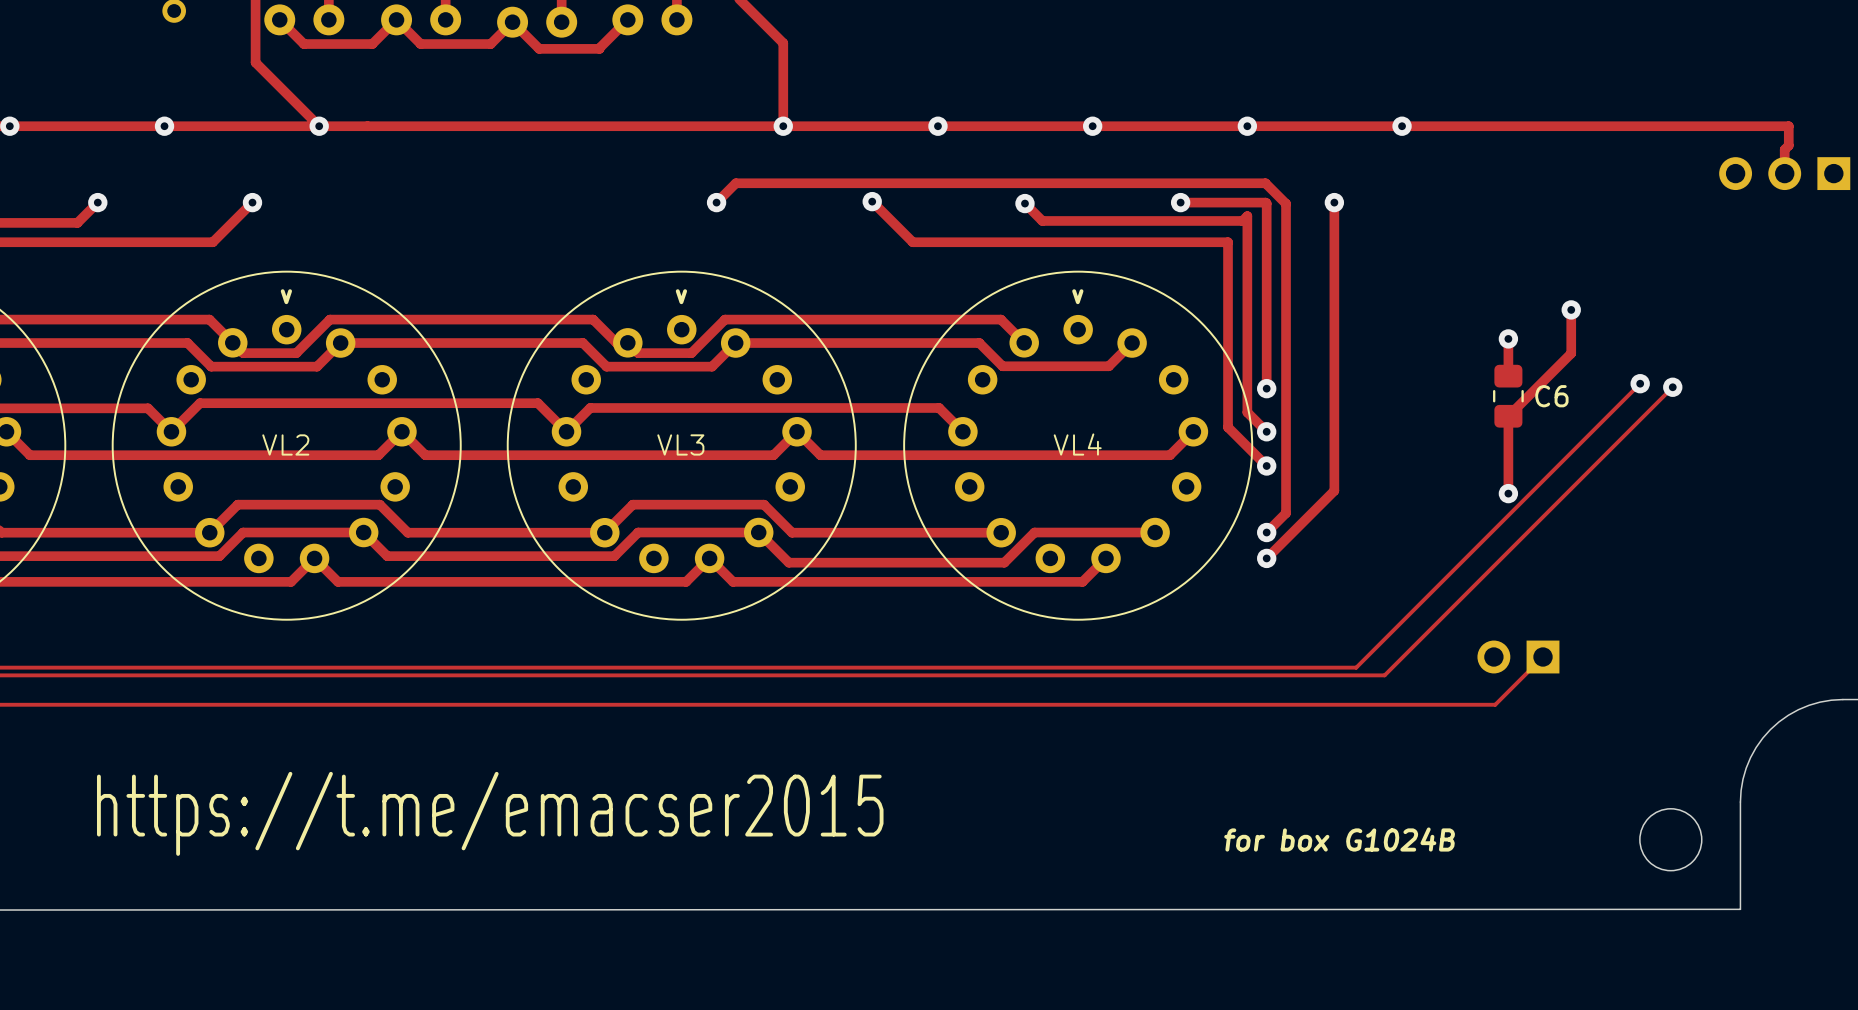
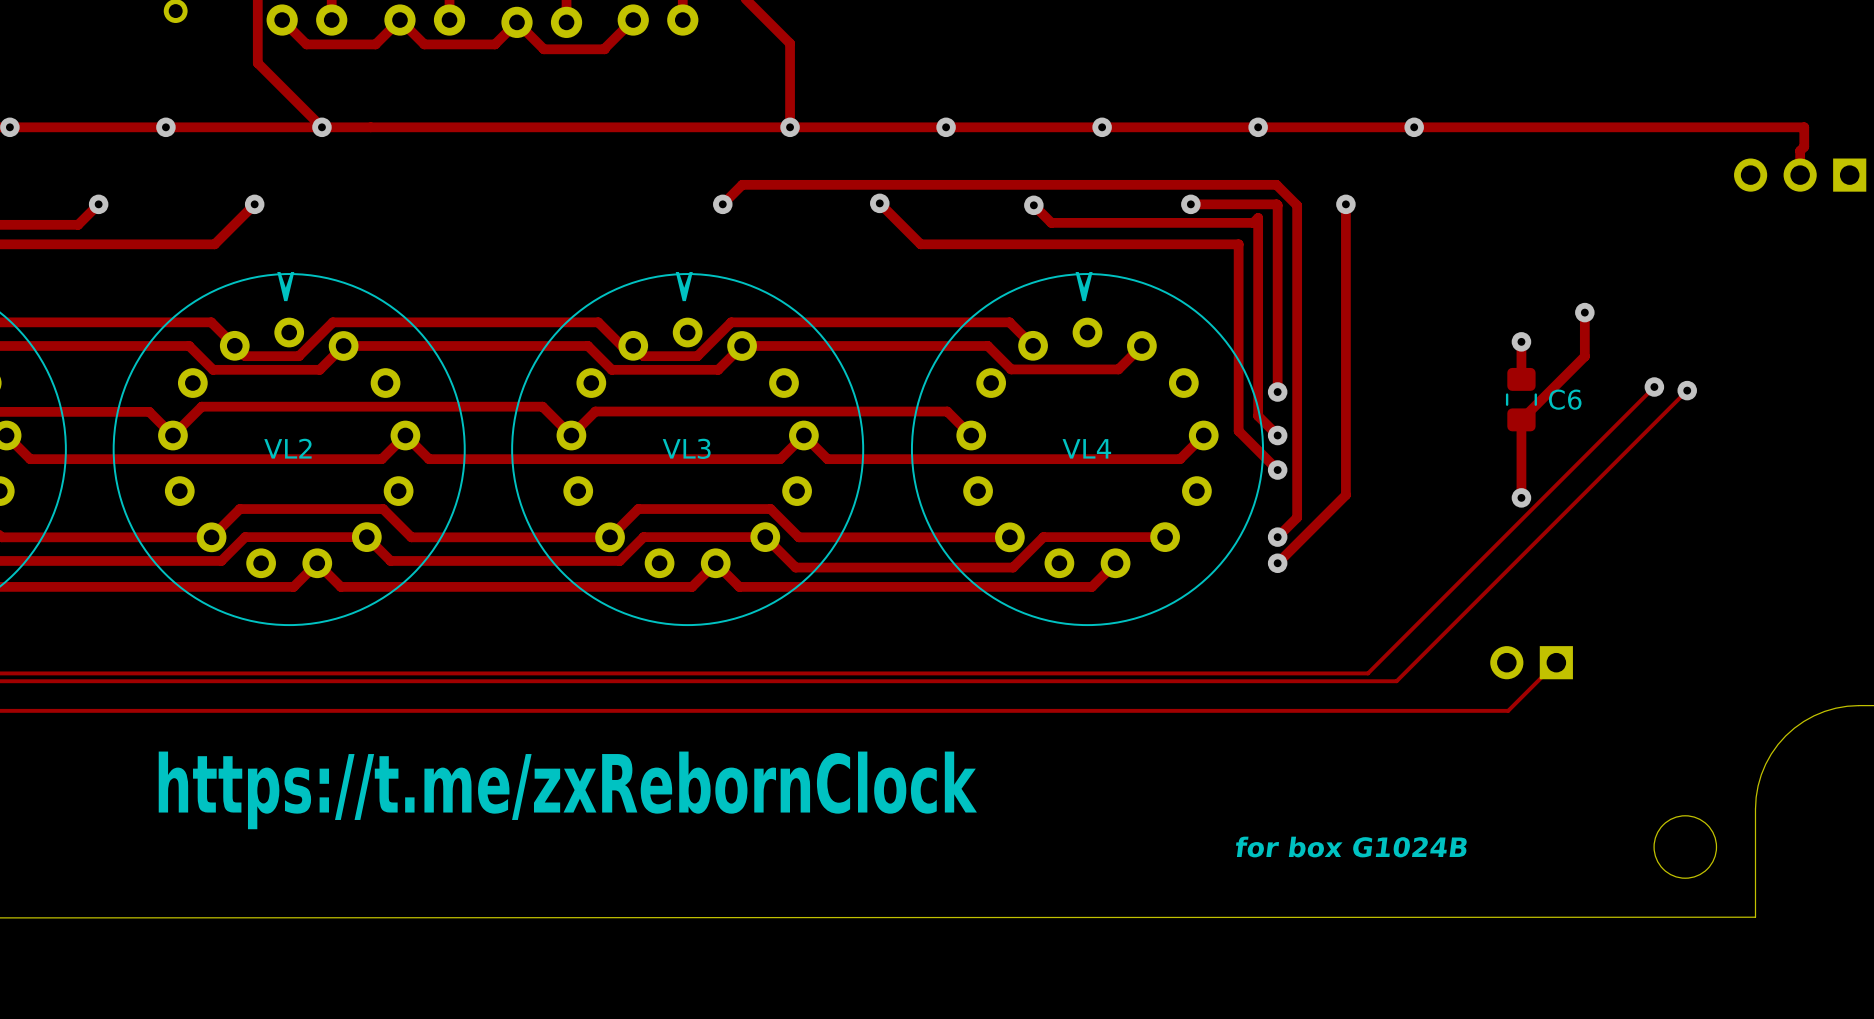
text: none -> https://t.me/zxRebornClock (567, 790)
text: https://t.me/emacser2015 (490, 813) -> none

